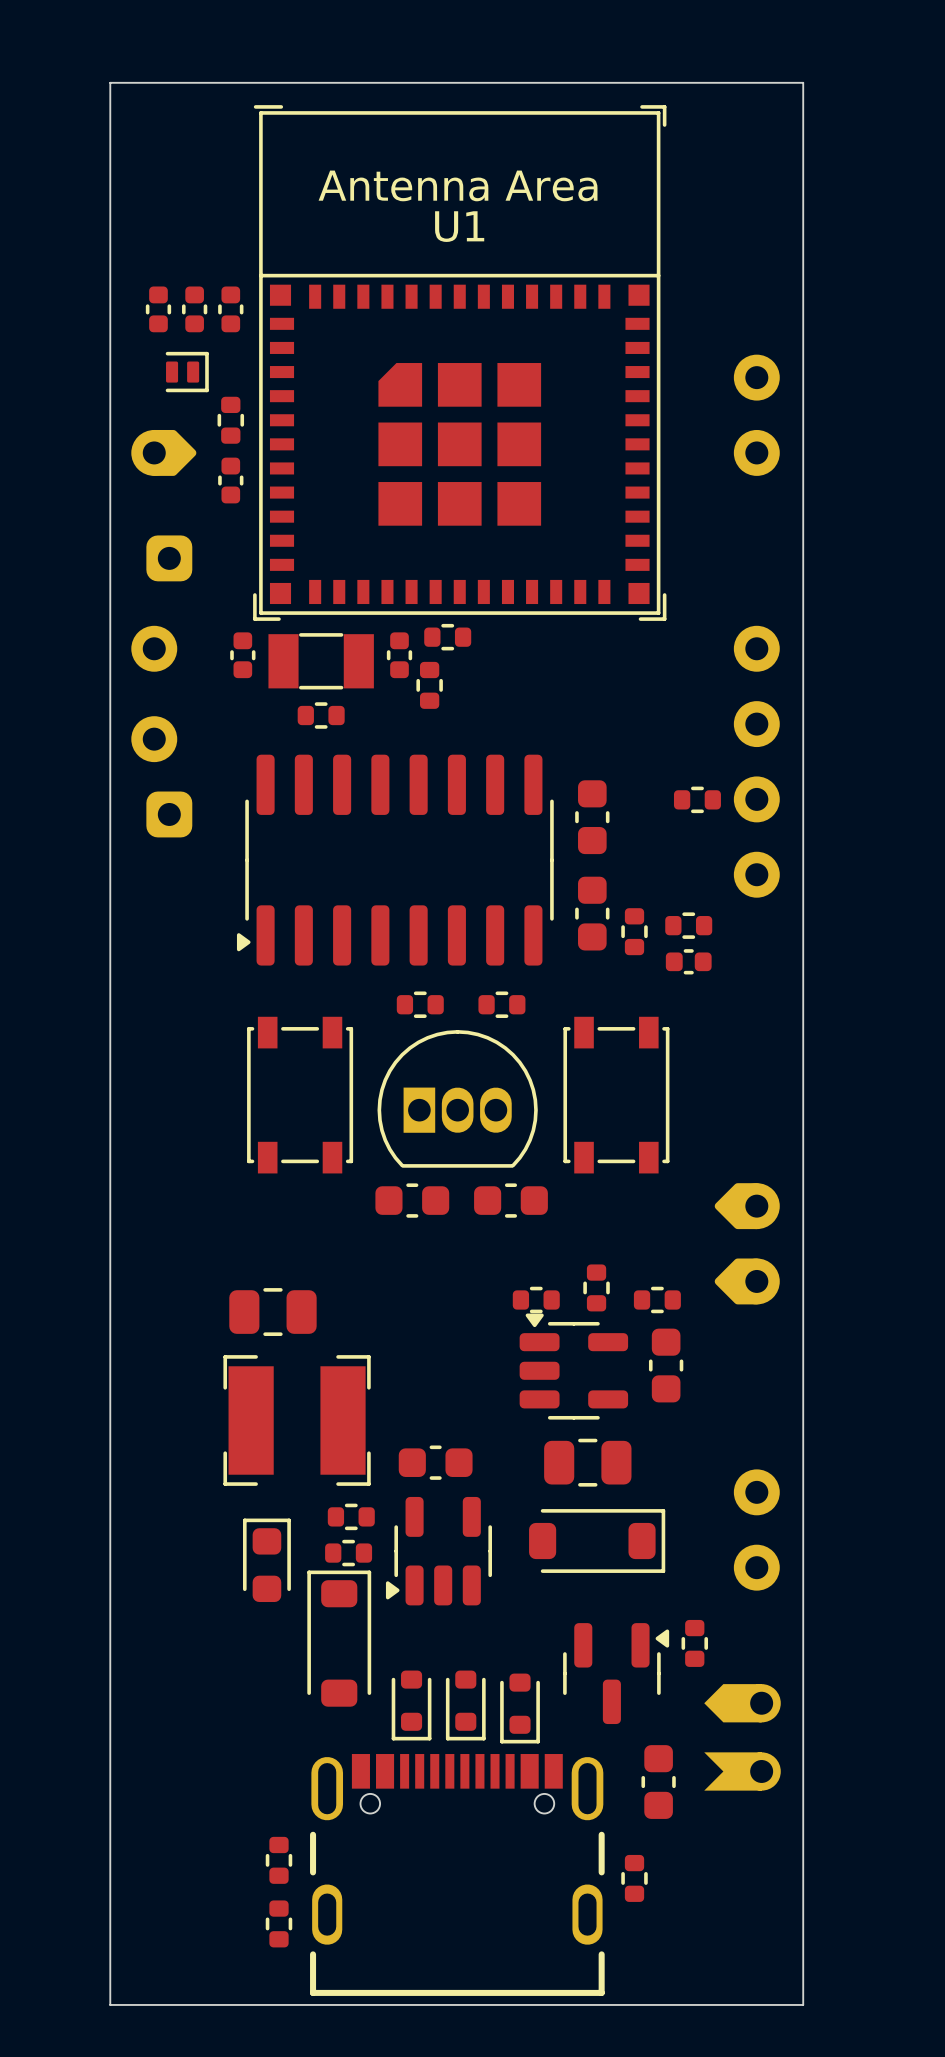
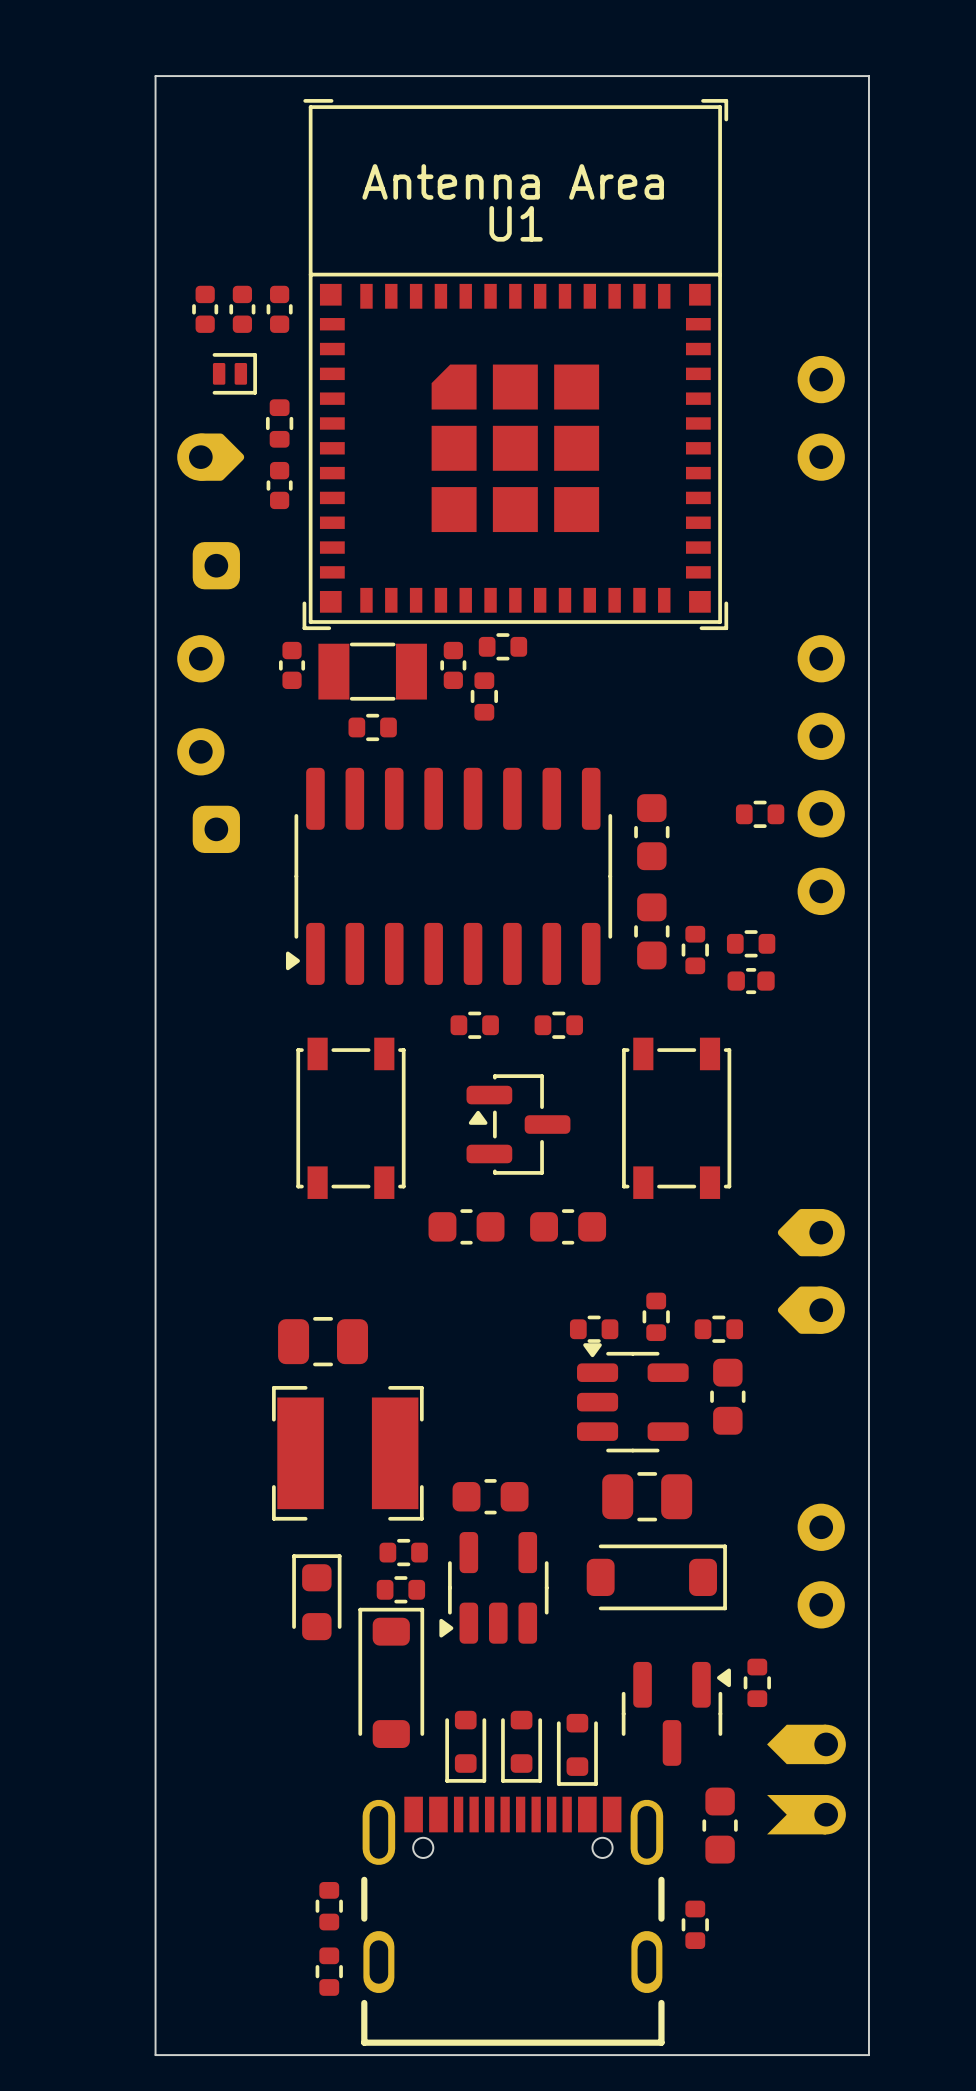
part footprint: [377, 1030, 538, 1168] -> [466, 1074, 571, 1175]

